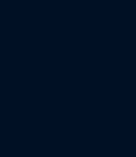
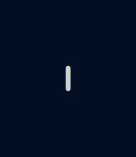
board edge: none -> (68, 68) (68, 88)

